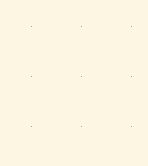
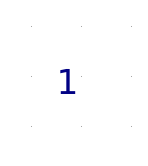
text: none -> 1 (67, 81)

